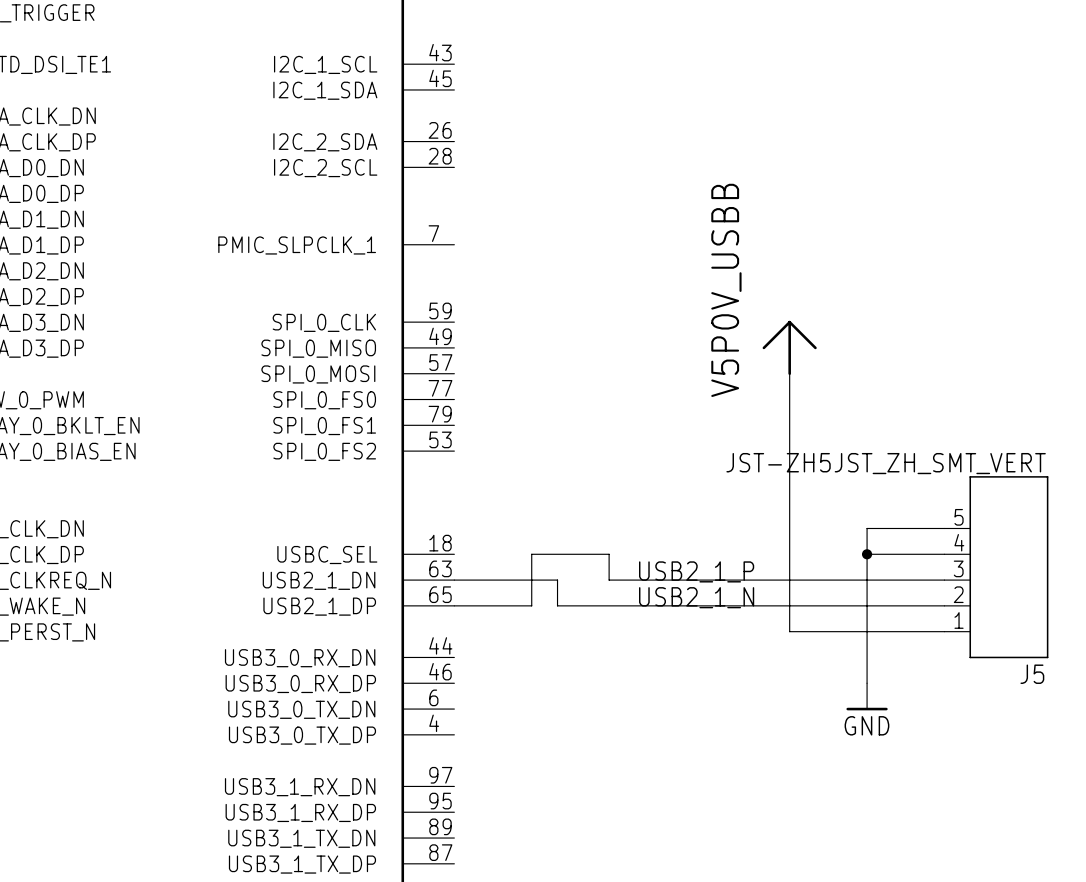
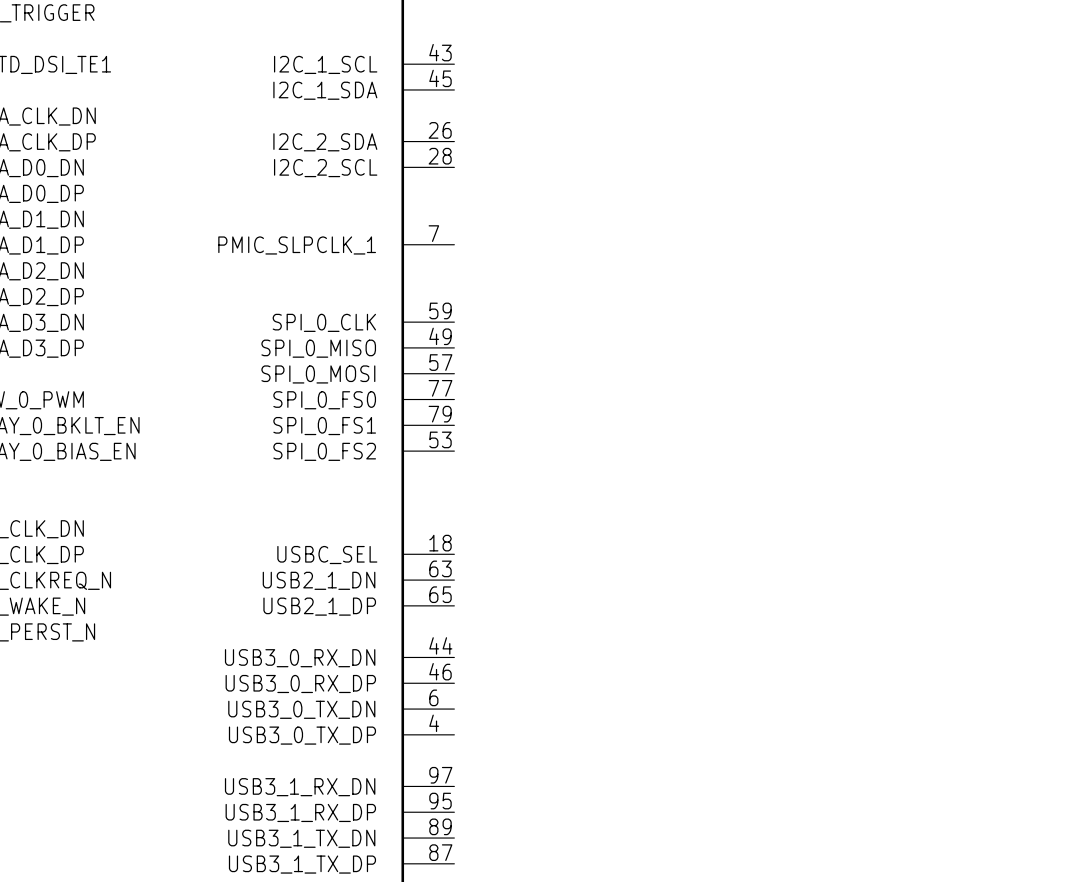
power symbol: V5P0V_USBB (789, 347) -> none
wire: (789, 373) (789, 631) (944, 631) -> none
wire: (944, 528) (867, 528) (867, 683) -> none
wire: (867, 554) (944, 554) -> none
junction: (867, 554) -> none
J5: JST-ZH5JST_ZH_SMT_VERT (996, 567) -> none
label: USB2_1_P (696, 571) -> none
wire: (454, 580) (557, 580) (557, 605) (944, 605) -> none
wire: (944, 580) (609, 580) (609, 554) (531, 554) (531, 605) (454, 605) -> none
label: USB2_1_N (696, 597) -> none
power symbol: GND (867, 696) -> none

